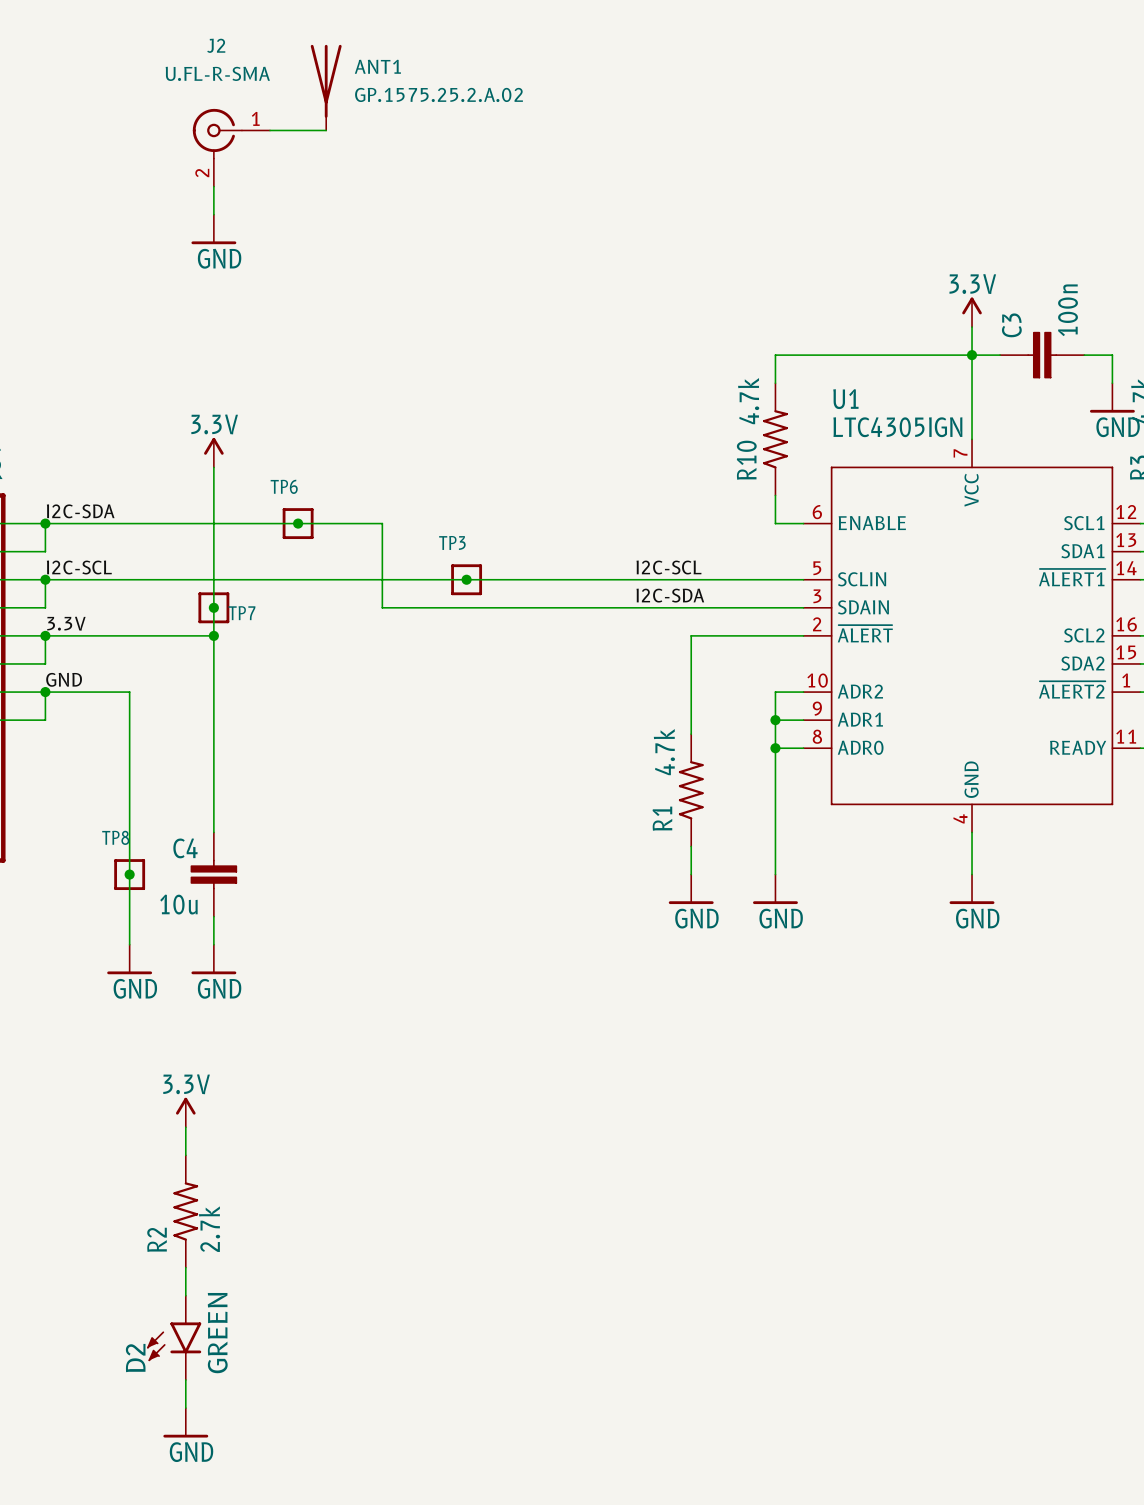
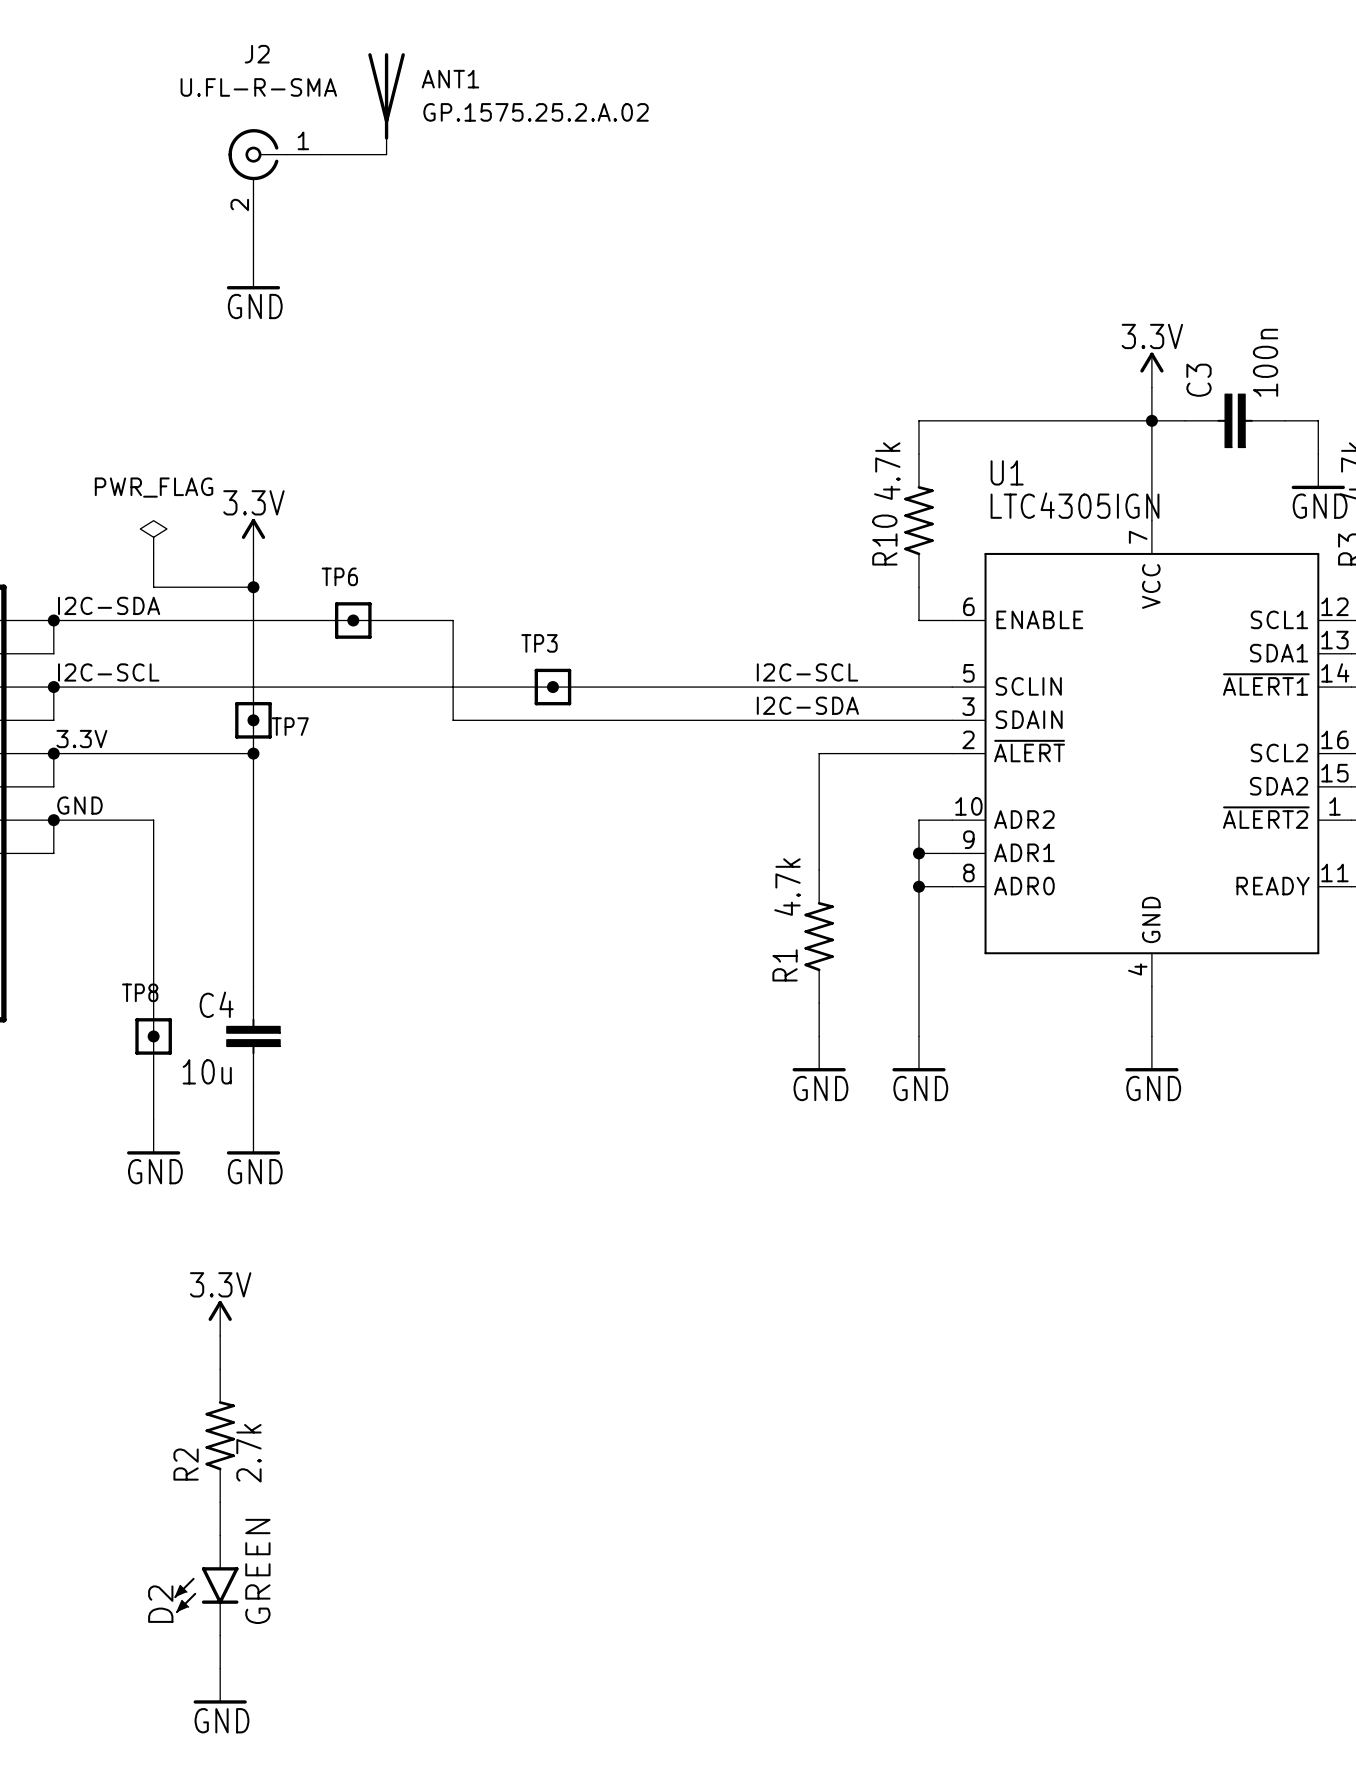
power symbol: none -> PWR_FLAG (153, 537)
wire: none -> (153, 553) (153, 587) (253, 587)
junction: none -> (253, 587)

